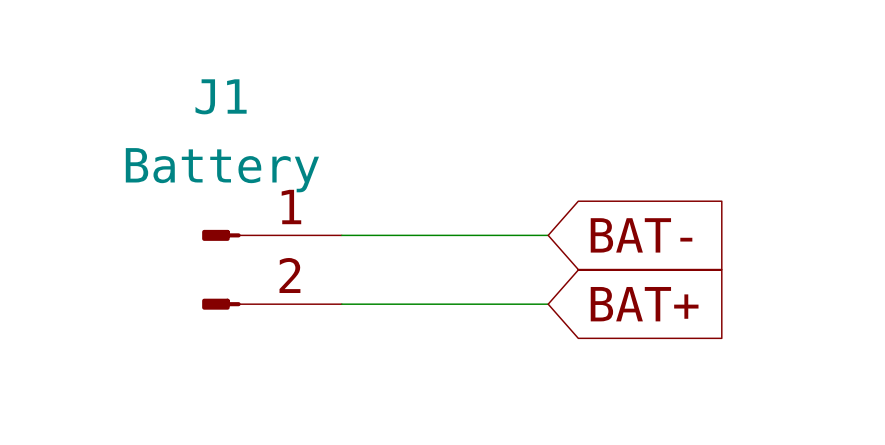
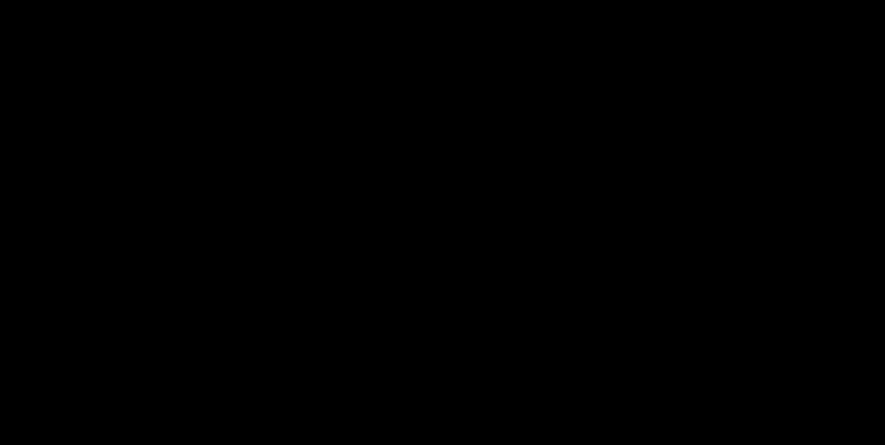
wire: (341, 235) (548, 235) -> none
global label: BAT- (641, 235) -> none
J1: Battery (271, 269) -> none
wire: (341, 304) (548, 304) -> none
global label: BAT+ (644, 304) -> none

